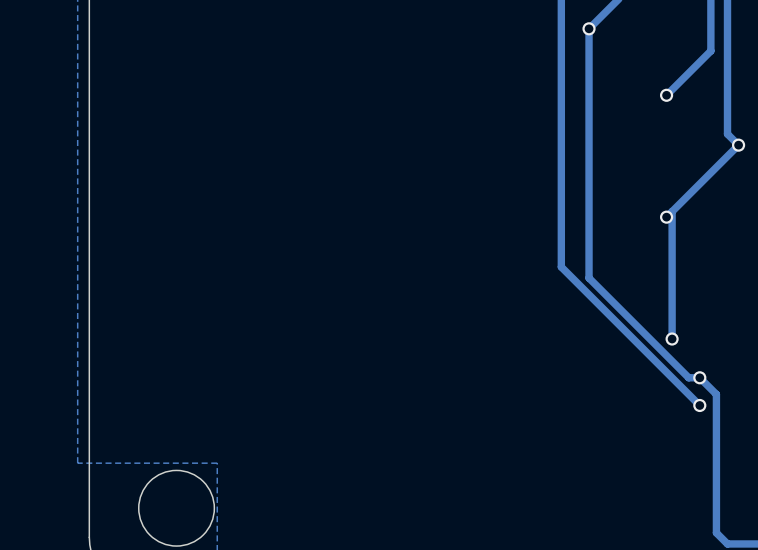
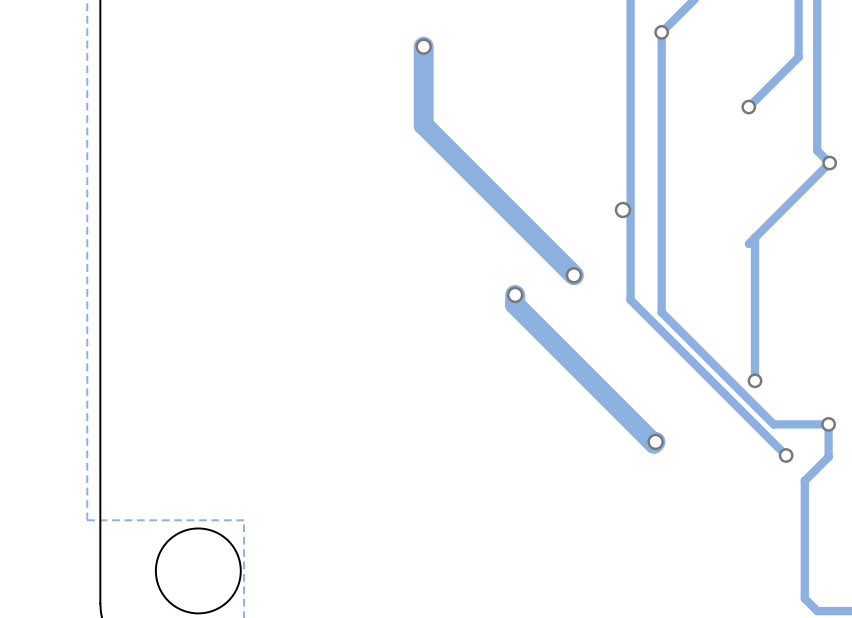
track: none -> (423, 46) (423, 125) (573, 275)
via: none -> (423, 46)
via: none -> (622, 210)
via: (666, 217) -> none
via: none -> (573, 275)
track: none -> (515, 294) (515, 304) (653, 443) (655, 441)
via: none -> (515, 294)
track: (699, 377) (716, 394) (716, 428) -> (786, 424) (828, 424) (828, 457) (804, 480)
via: (699, 377) -> none
via: none -> (828, 424)
via: none -> (655, 441)

